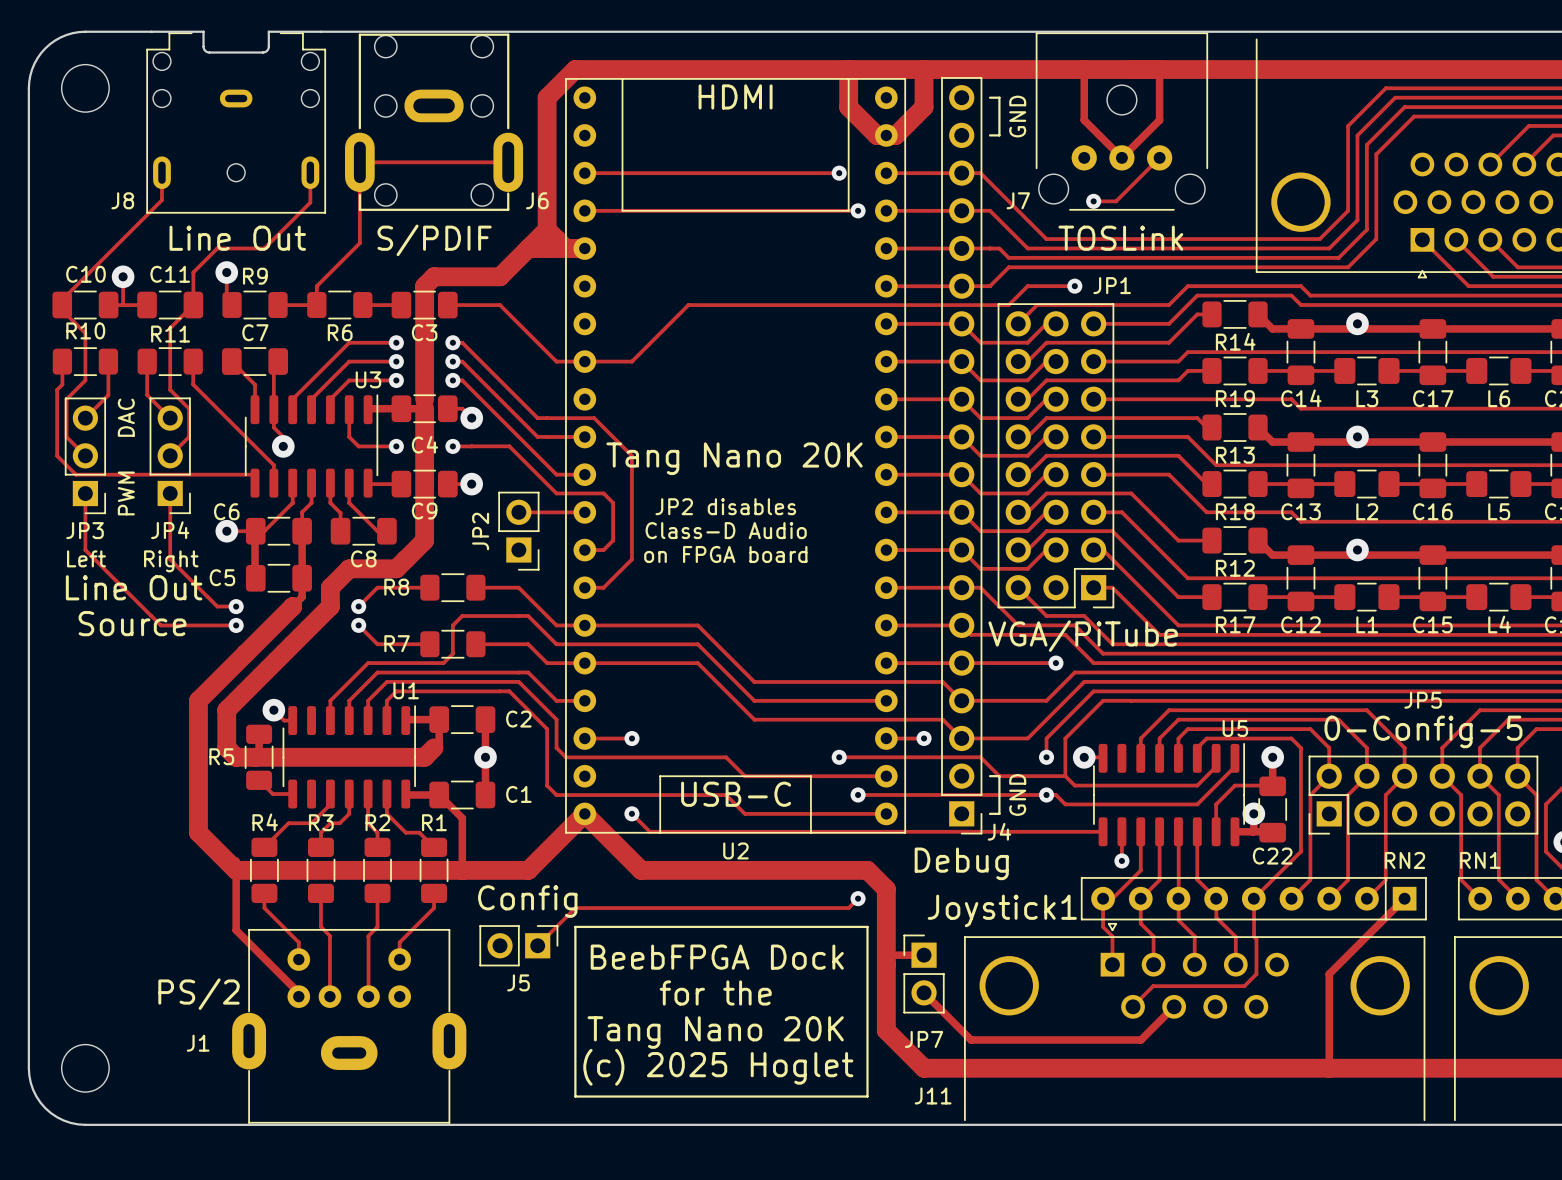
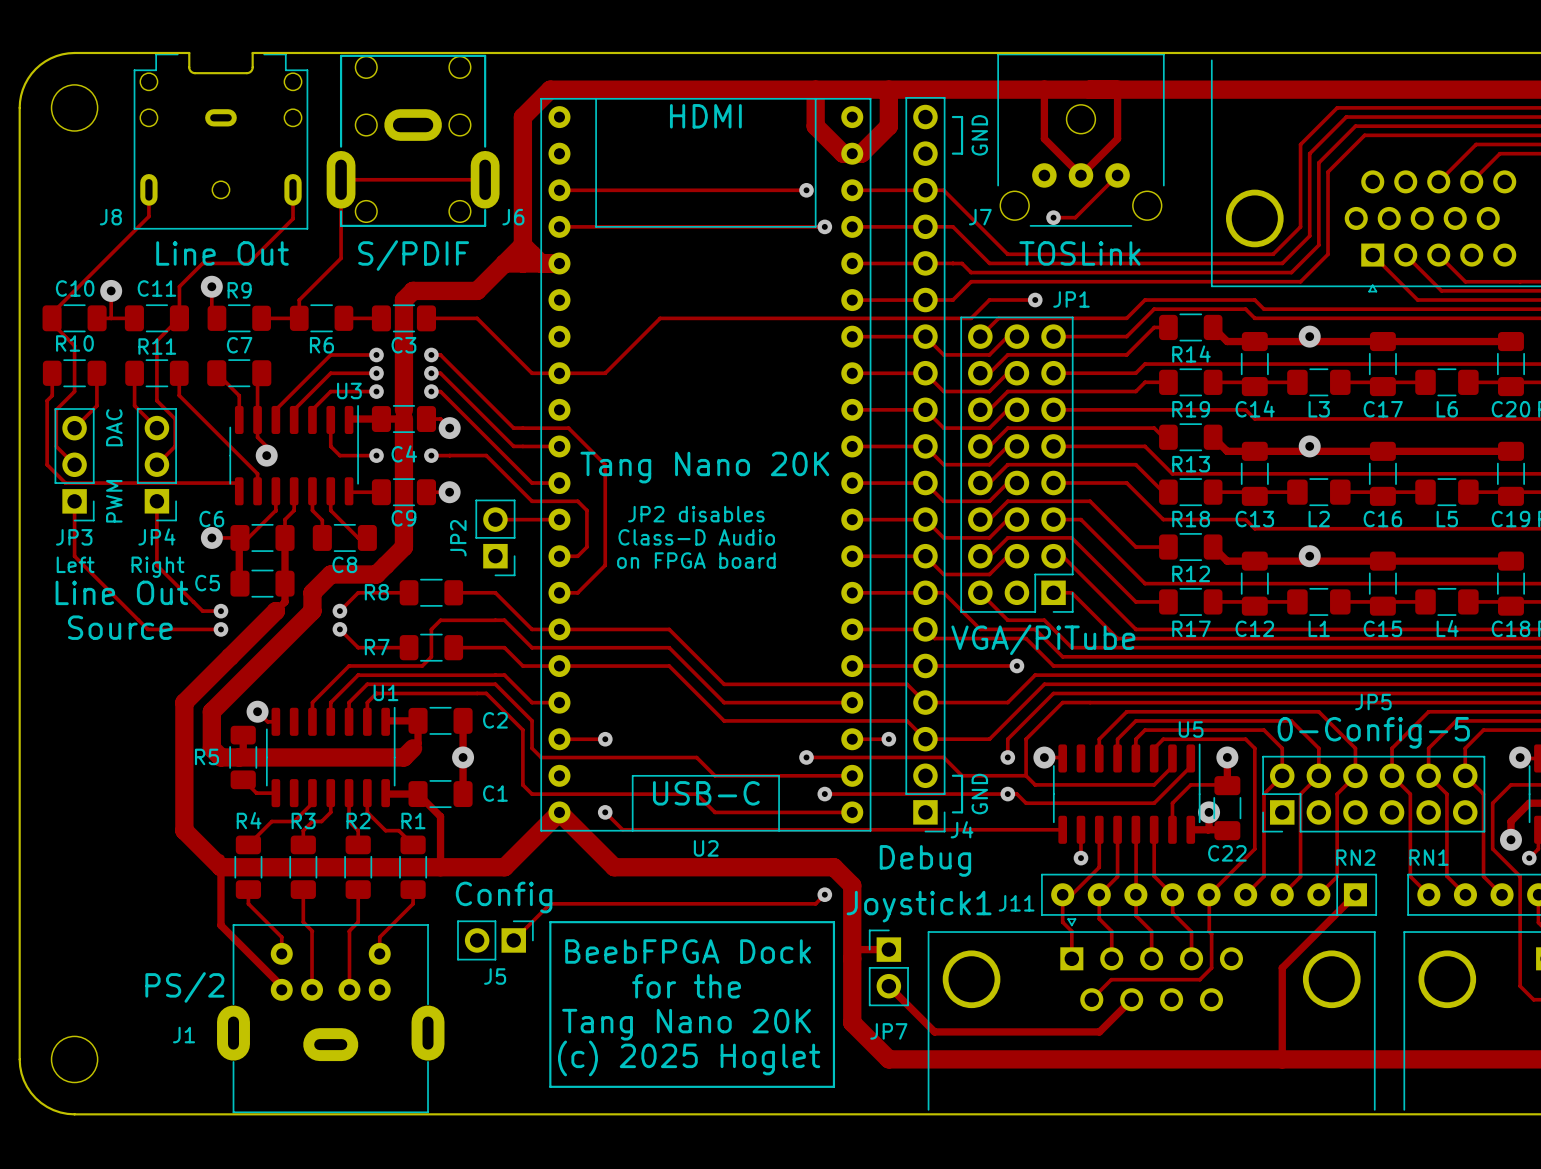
text position: Joystick1 (1002, 910) -> Joystick1 (919, 906)
J11 name position: J11 (933, 1095) -> J11 (1016, 903)

